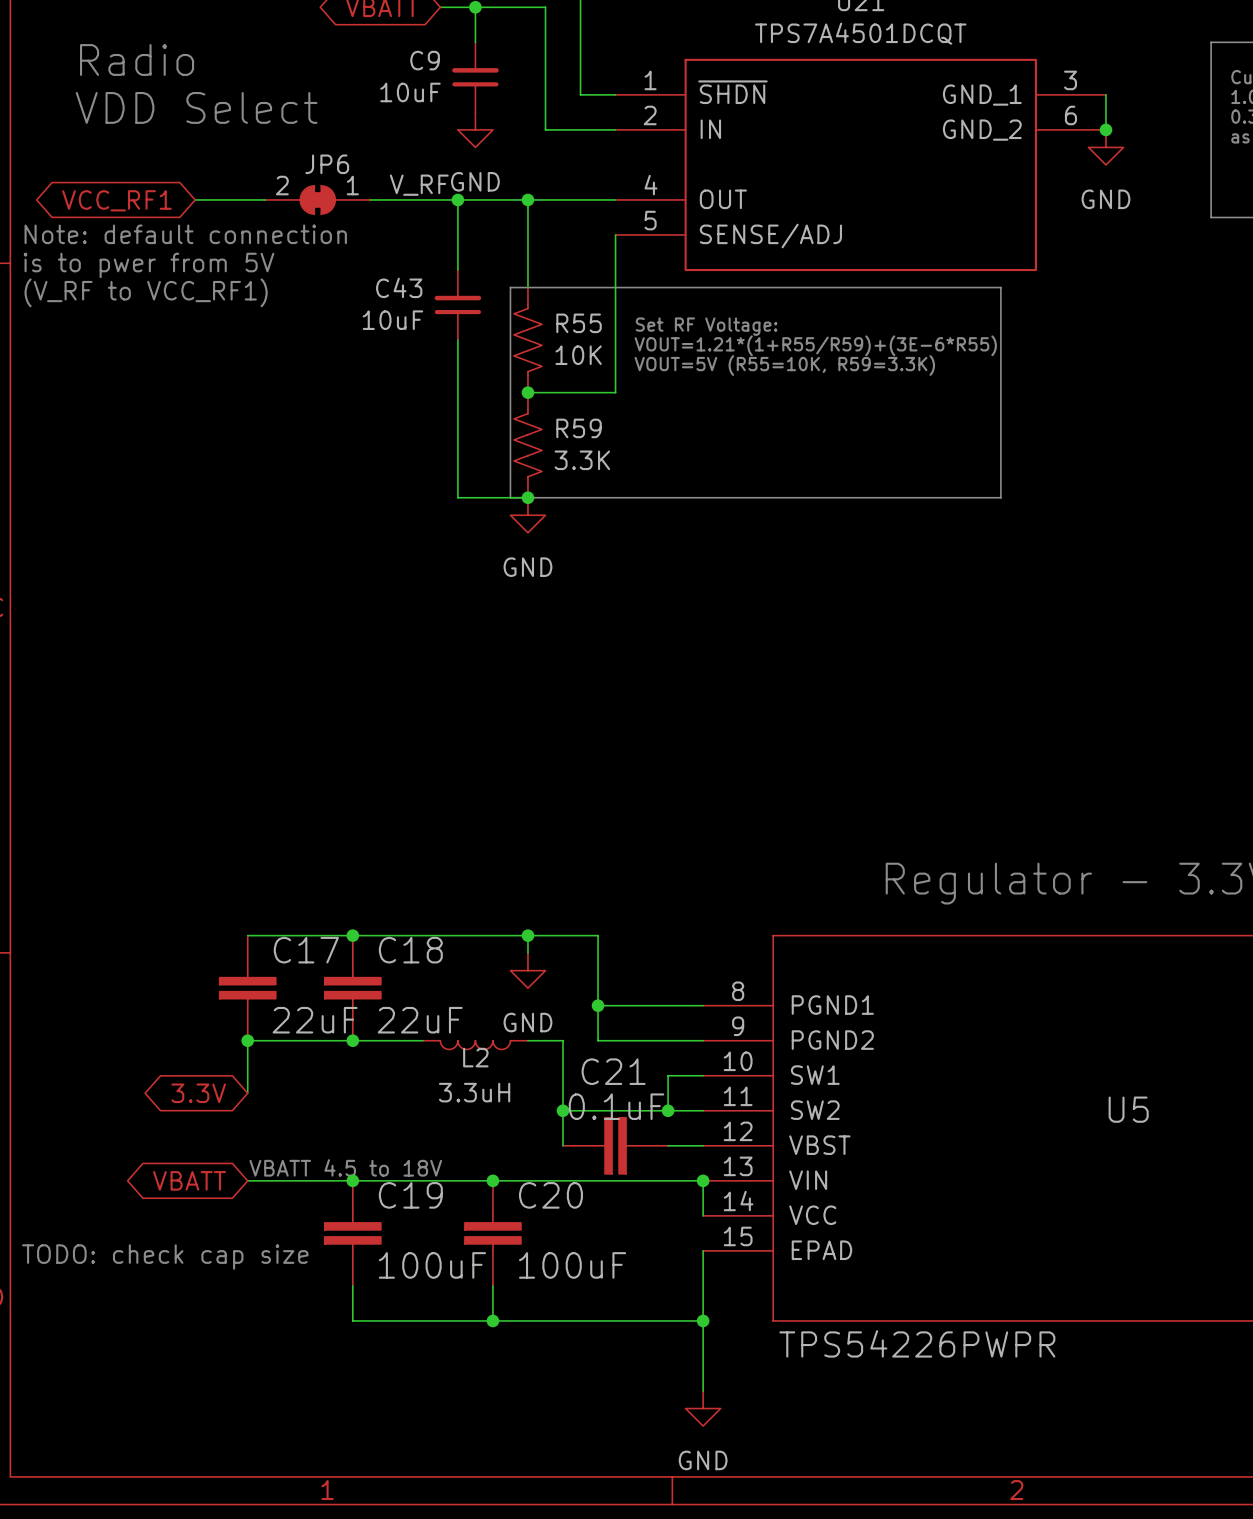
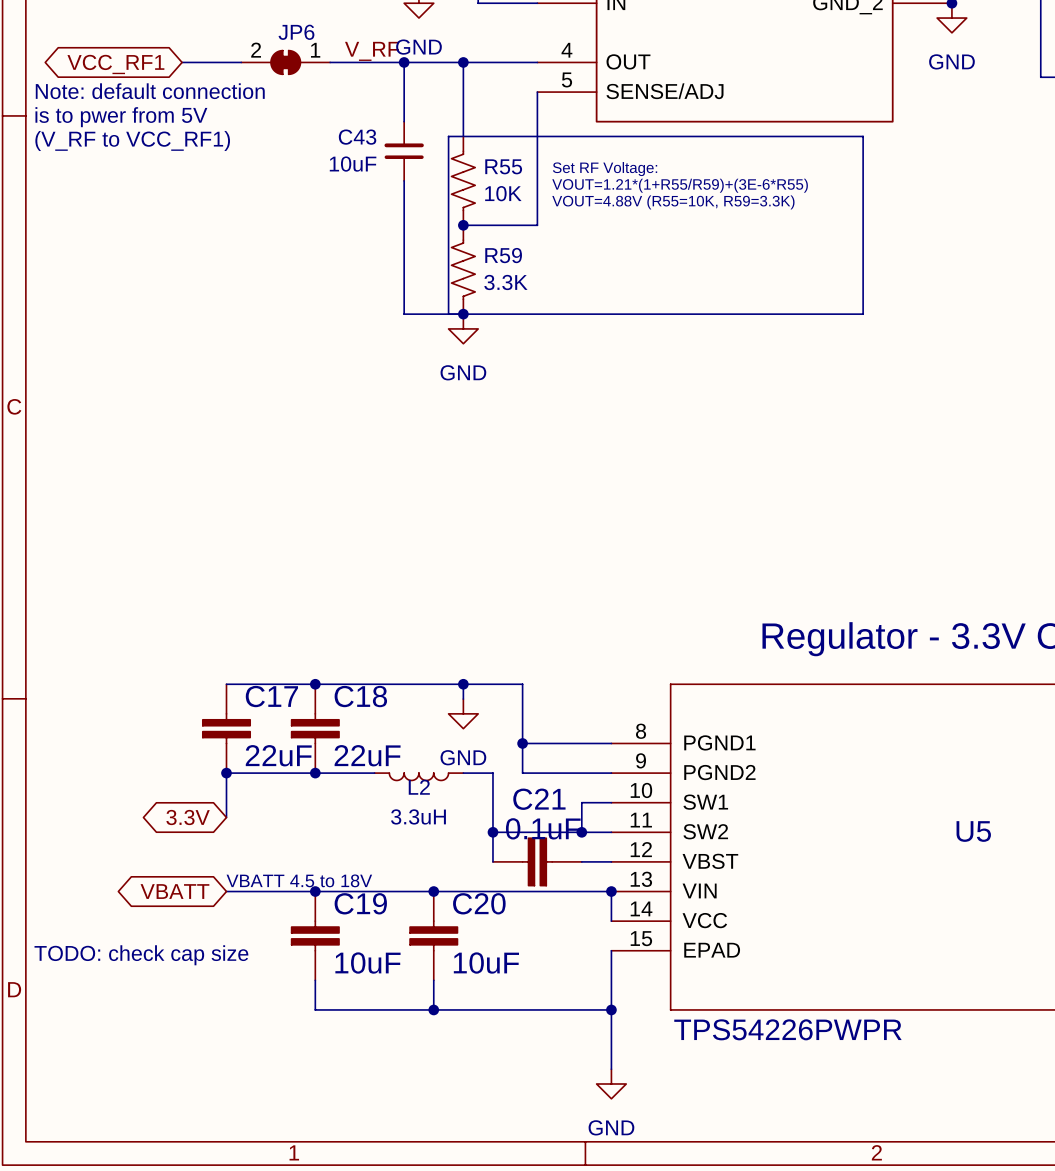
text: VOUT=5V (R55=10K, R59=3.3K) (784, 365) -> VOUT=4.88V (R55=10K, R59=3.3K) (673, 202)
C19 value: 100uF (432, 1265) -> 10uF (367, 963)
C20 value: 100uF (572, 1265) -> 10uF (486, 963)

